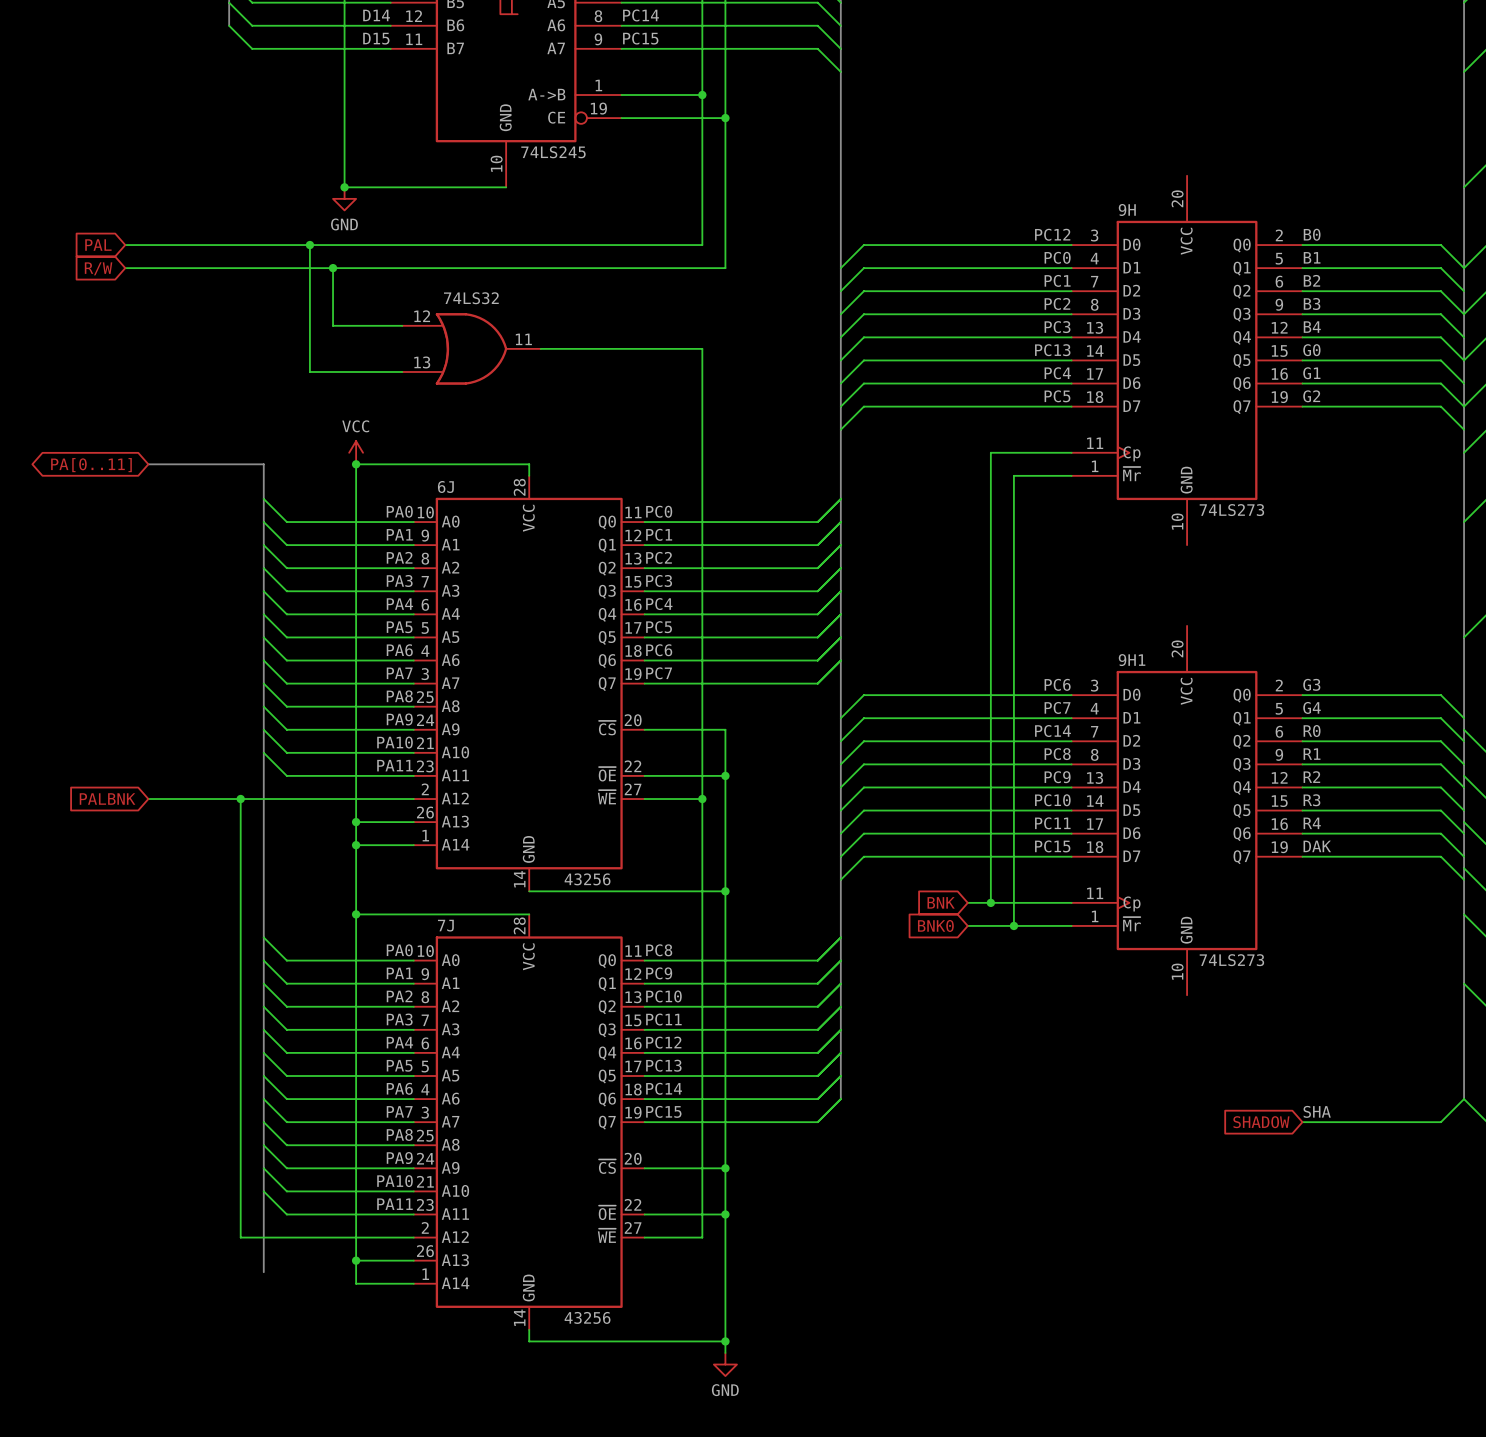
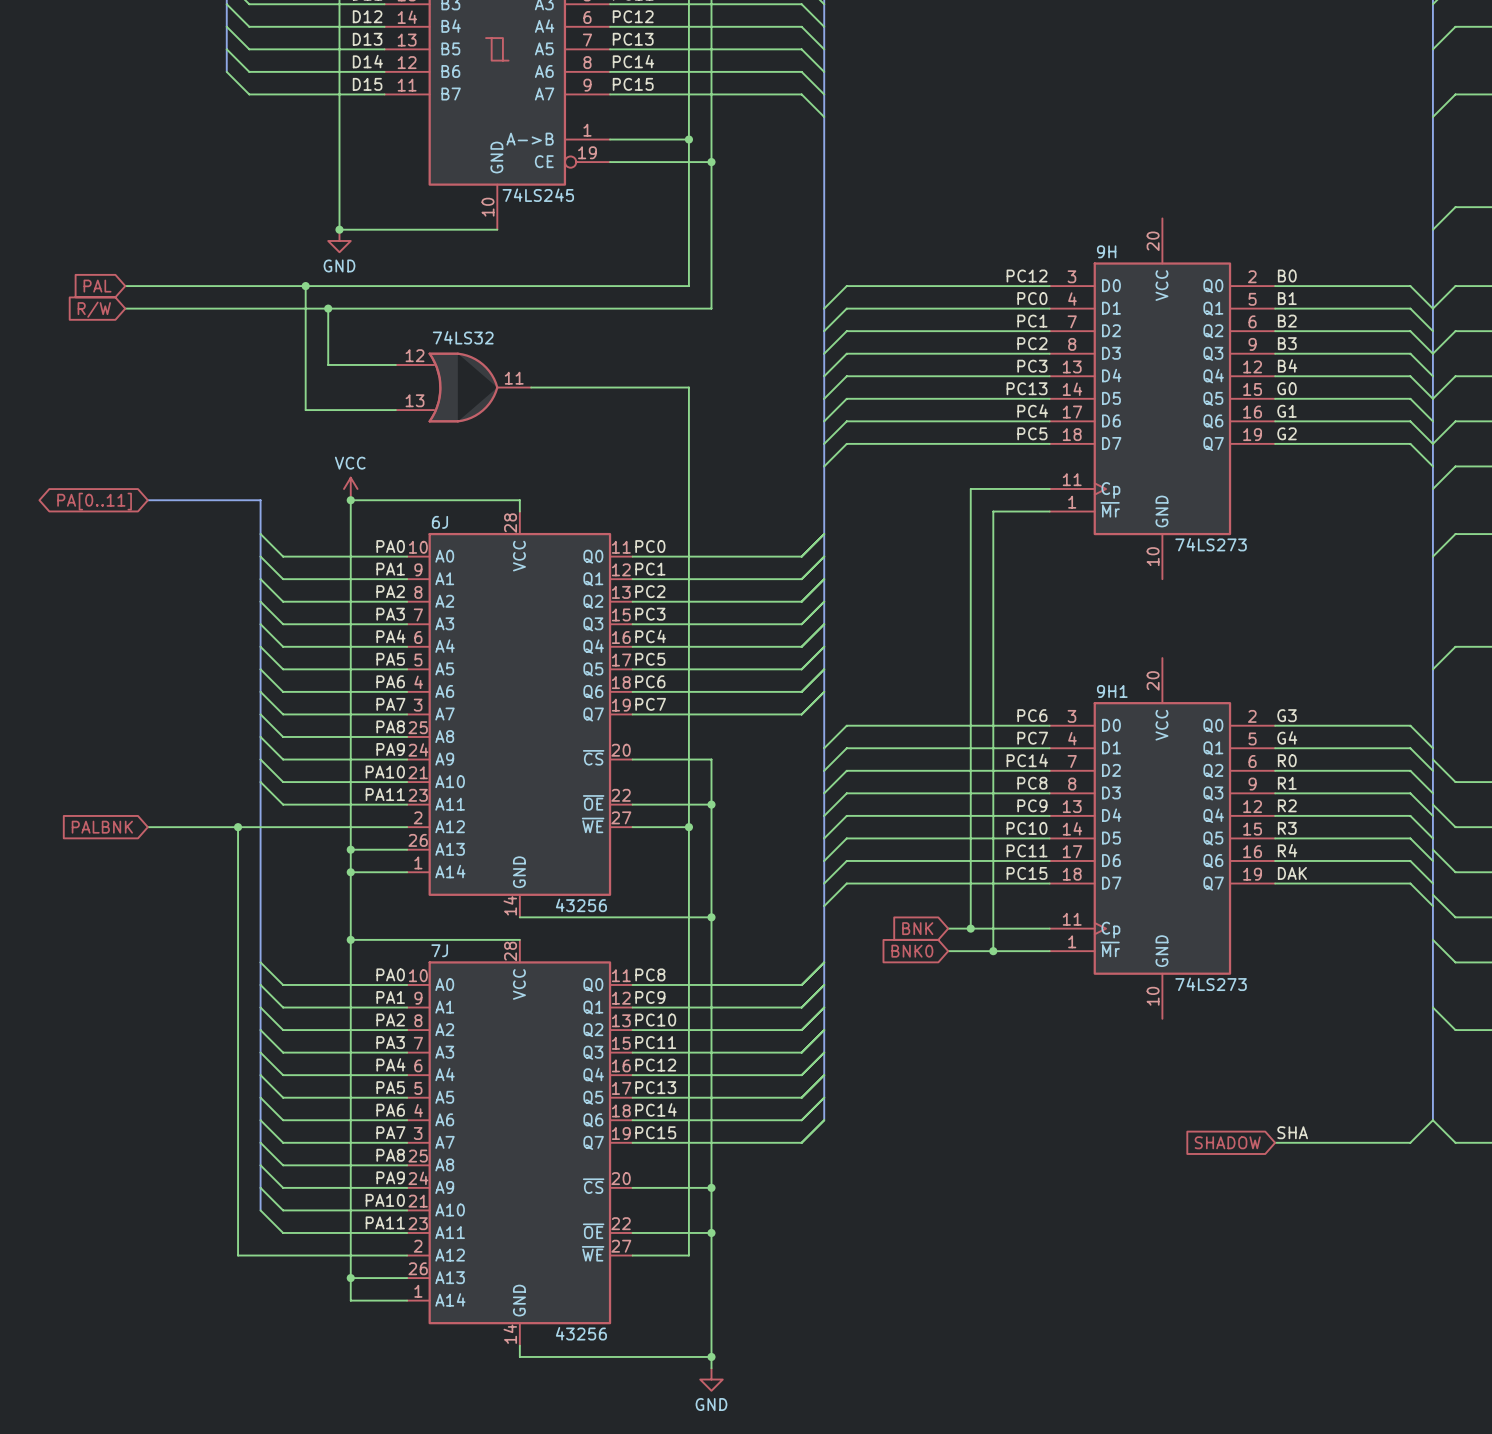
bus: (263, 1191) (263, 1272) -> none

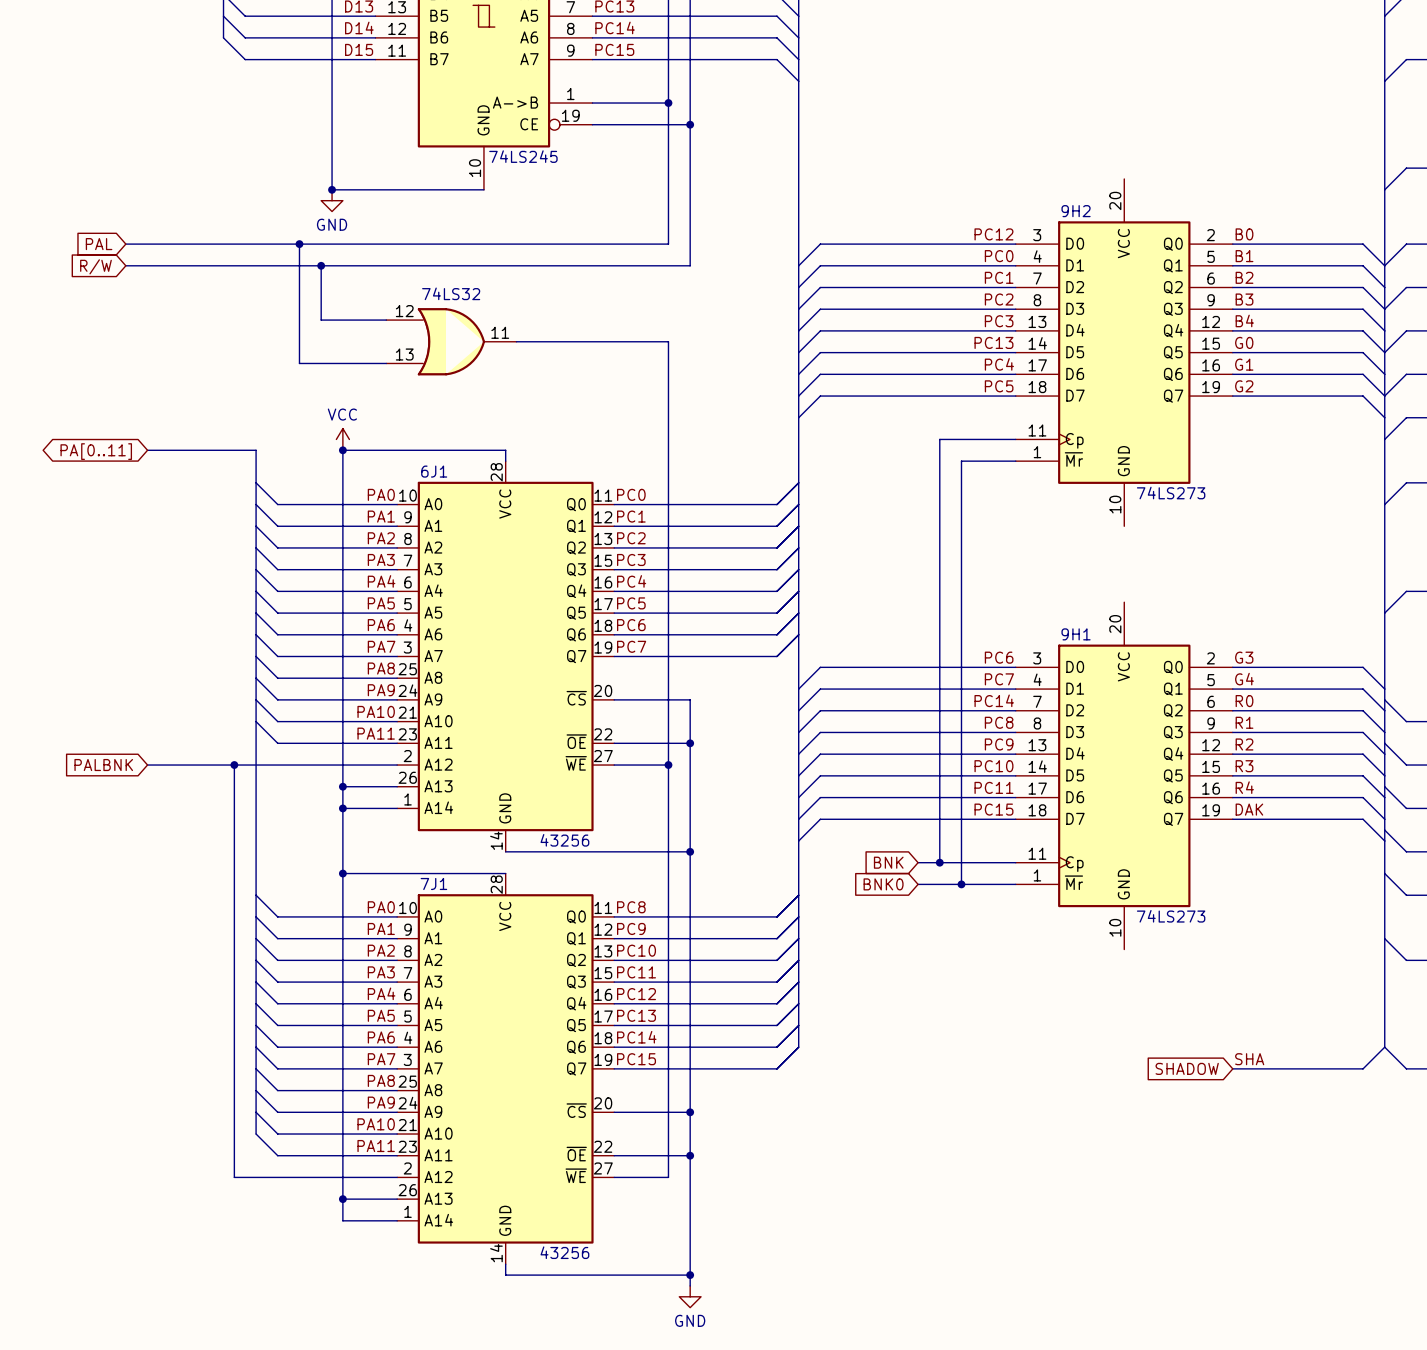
9H name: 9H (1106, 251) -> 9H2 (1076, 211)
6J name: 6J (439, 522) -> 6J1 (434, 471)
7J name: 7J (439, 950) -> 7J1 (433, 883)

